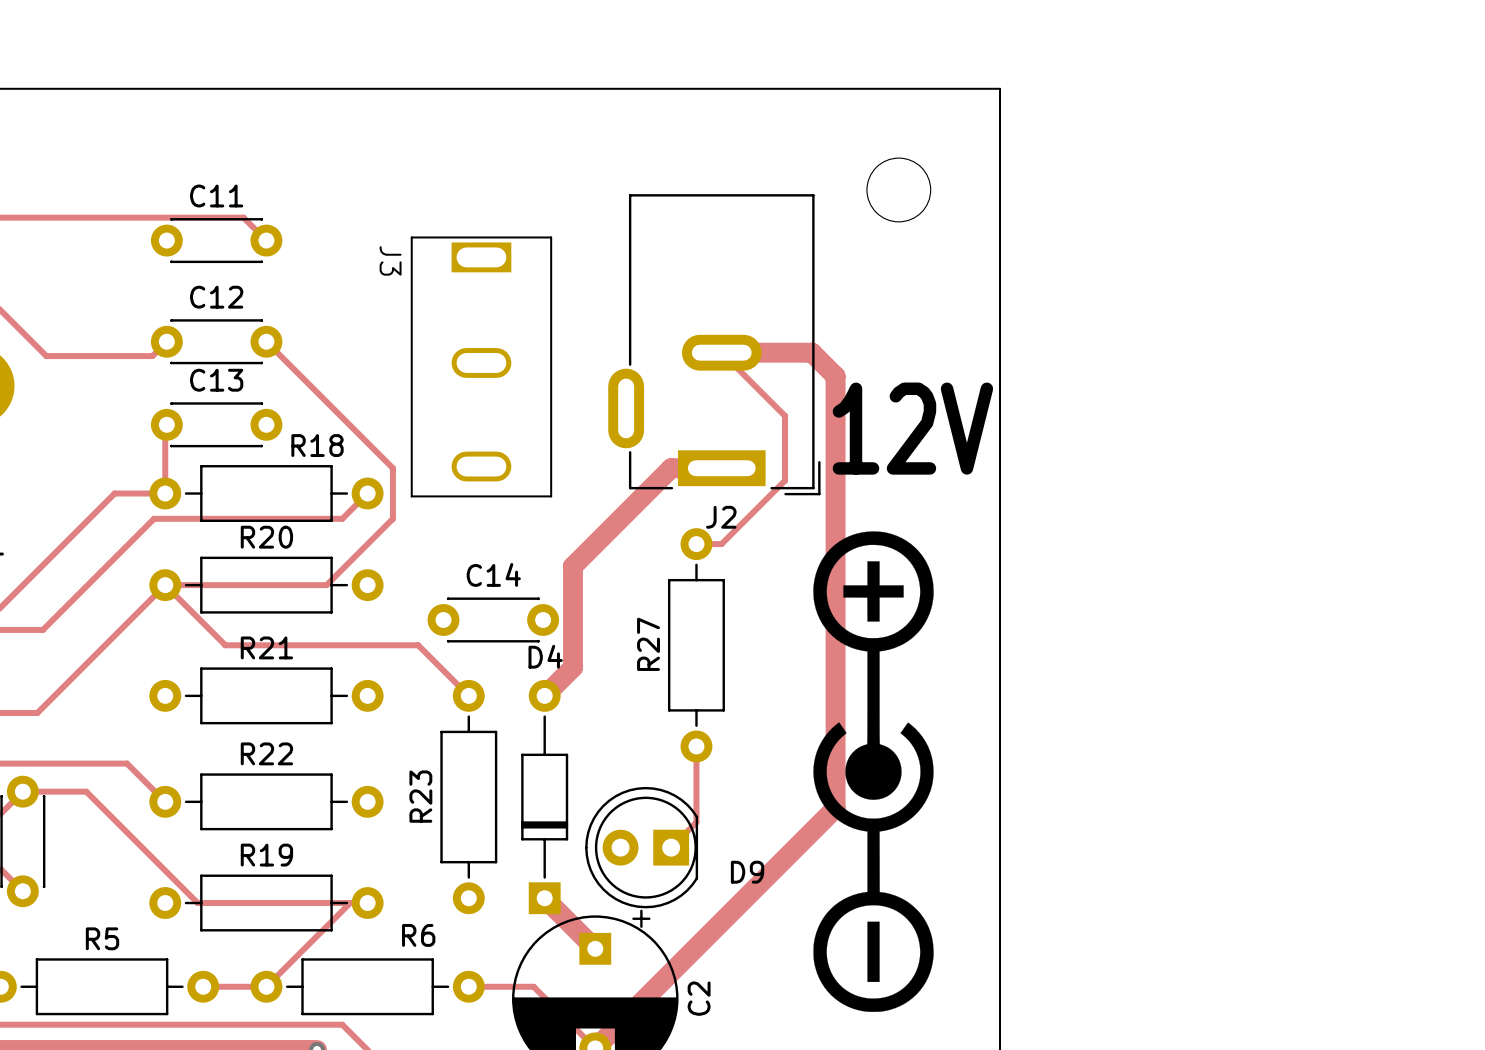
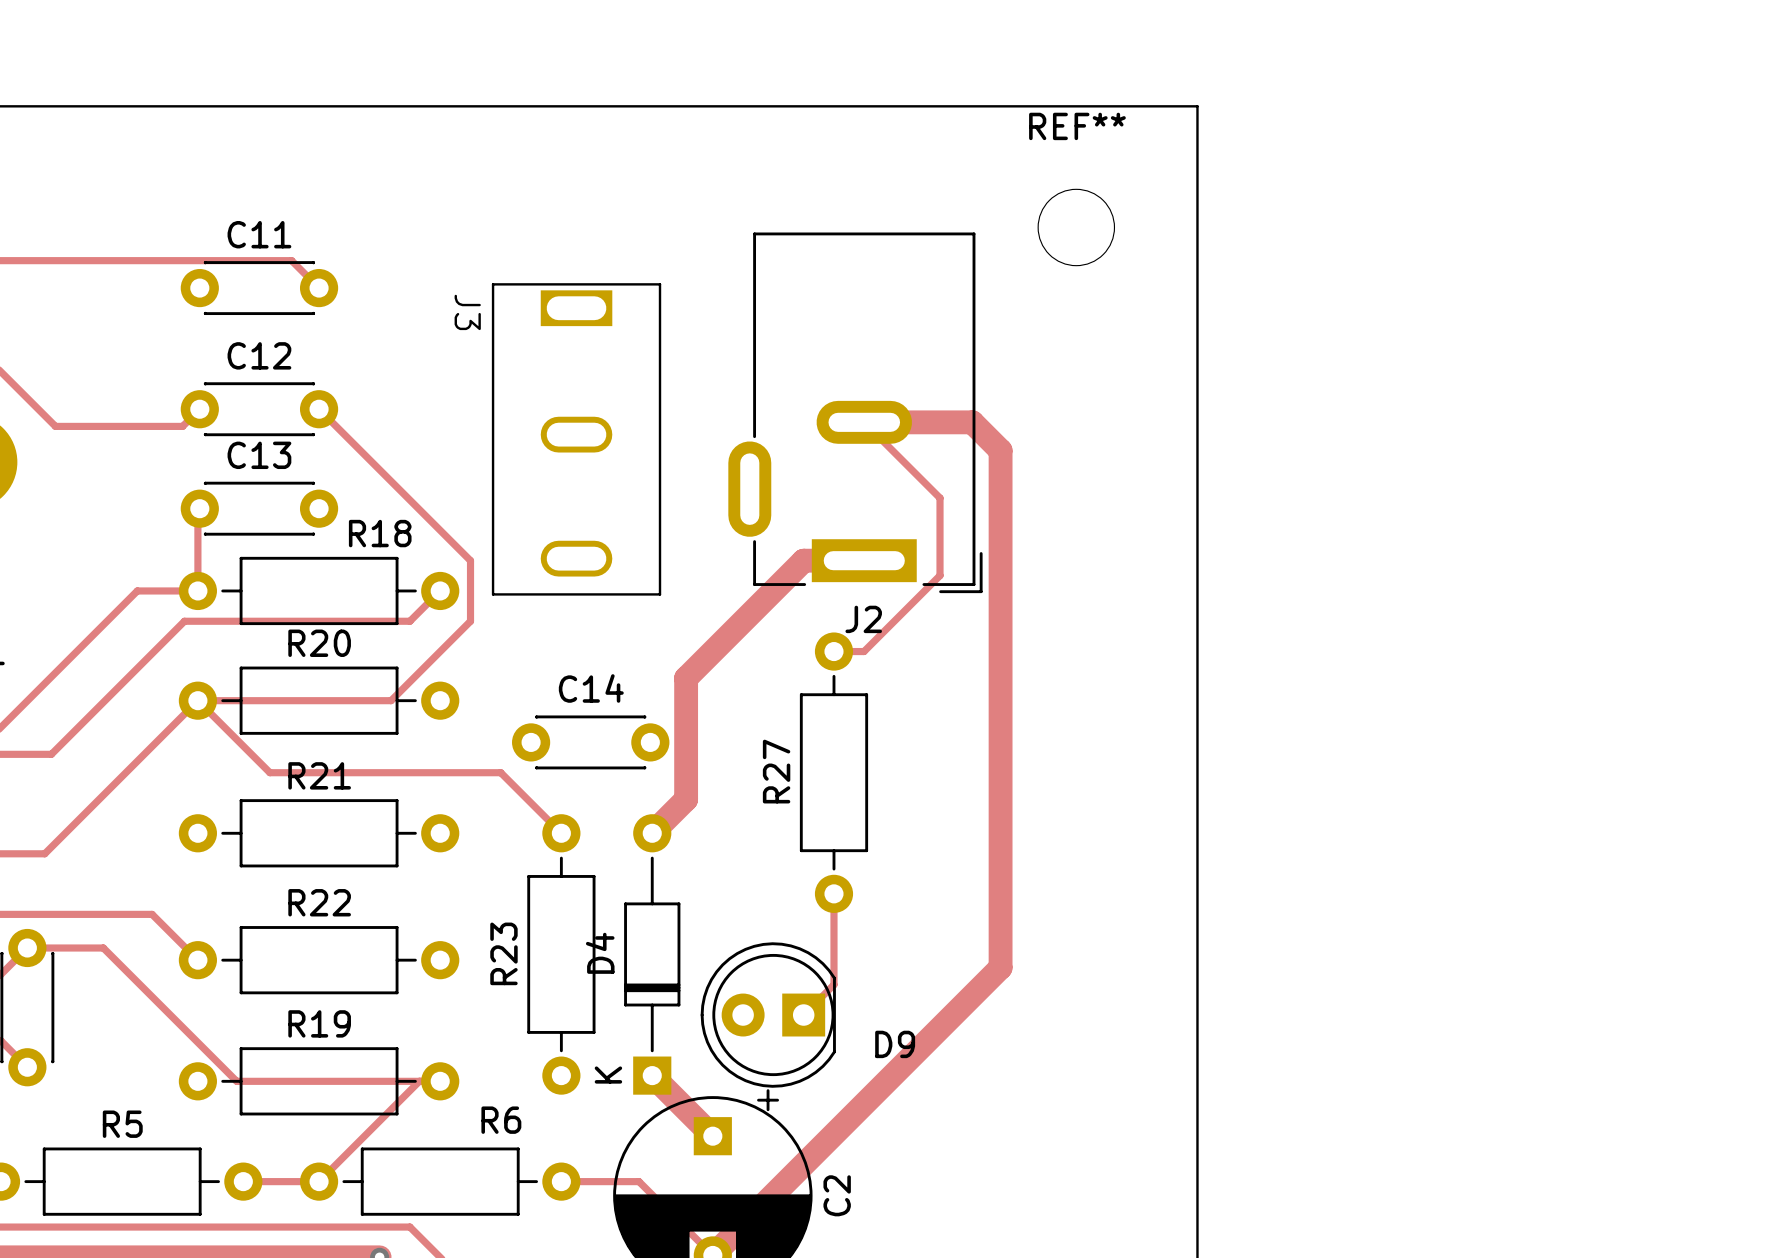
REF** name: none -> REF** (1077, 126)
text: 12V (912, 428) -> none
drawing: [813, 531, 934, 1012] -> none
D4 name rotation: 0° (545, 656) -> 90° counterclockwise (600, 953)
D4 name position: D4 (545, 656) -> D4 (600, 953)
D4 text: none -> K (608, 1075)

